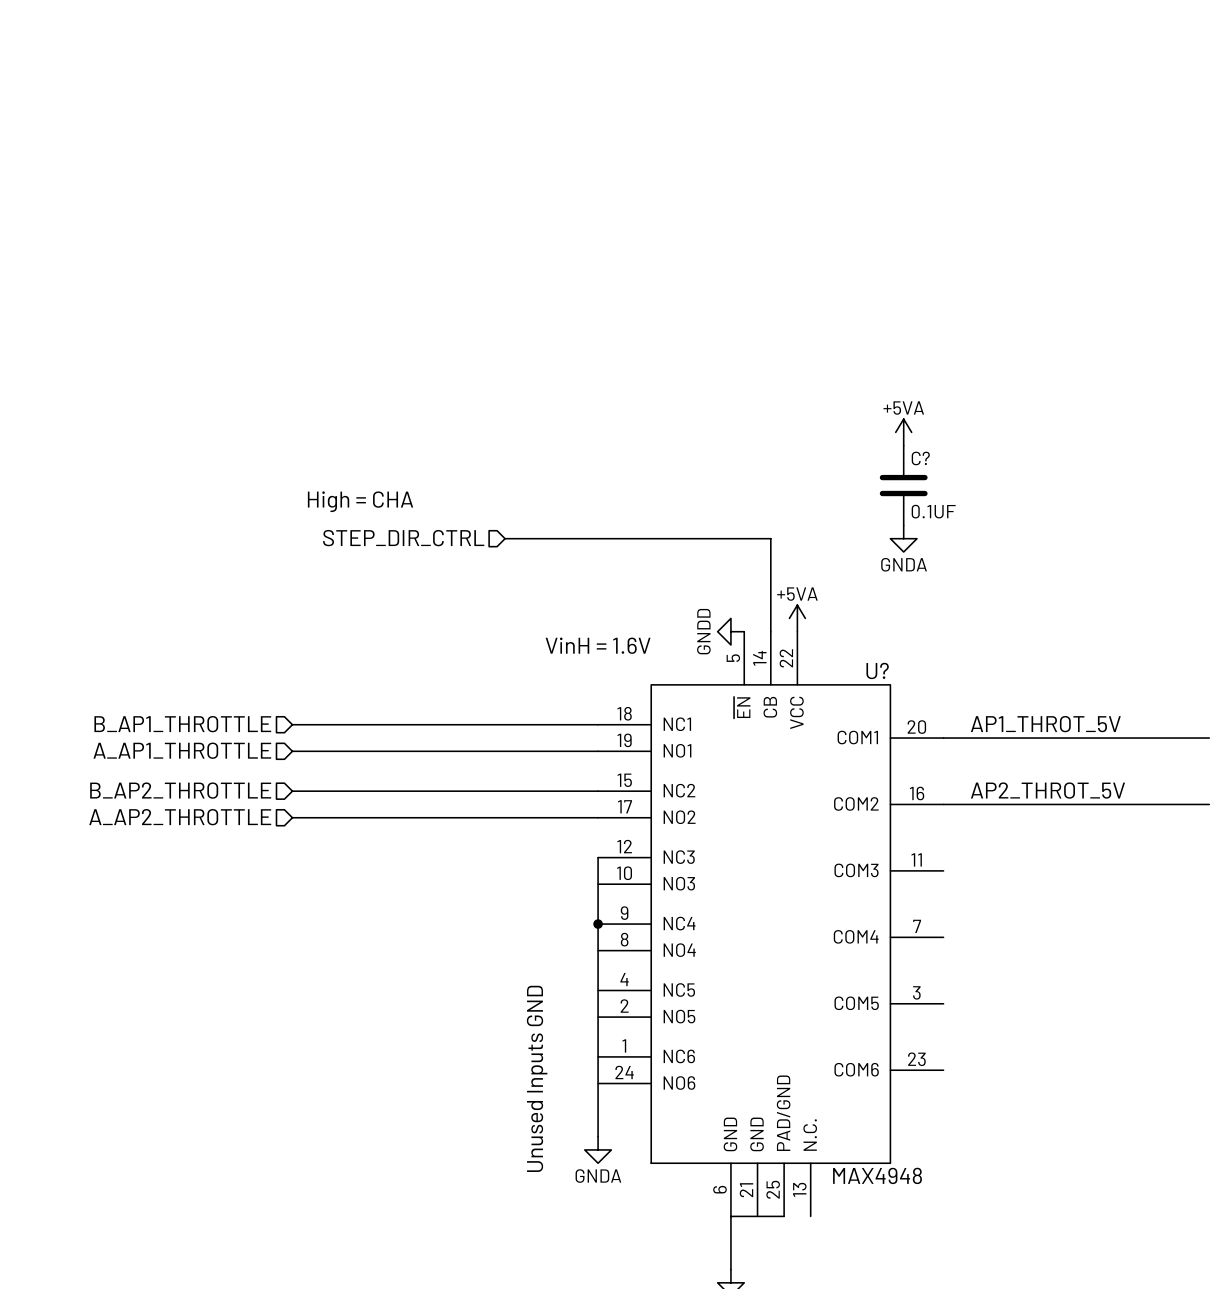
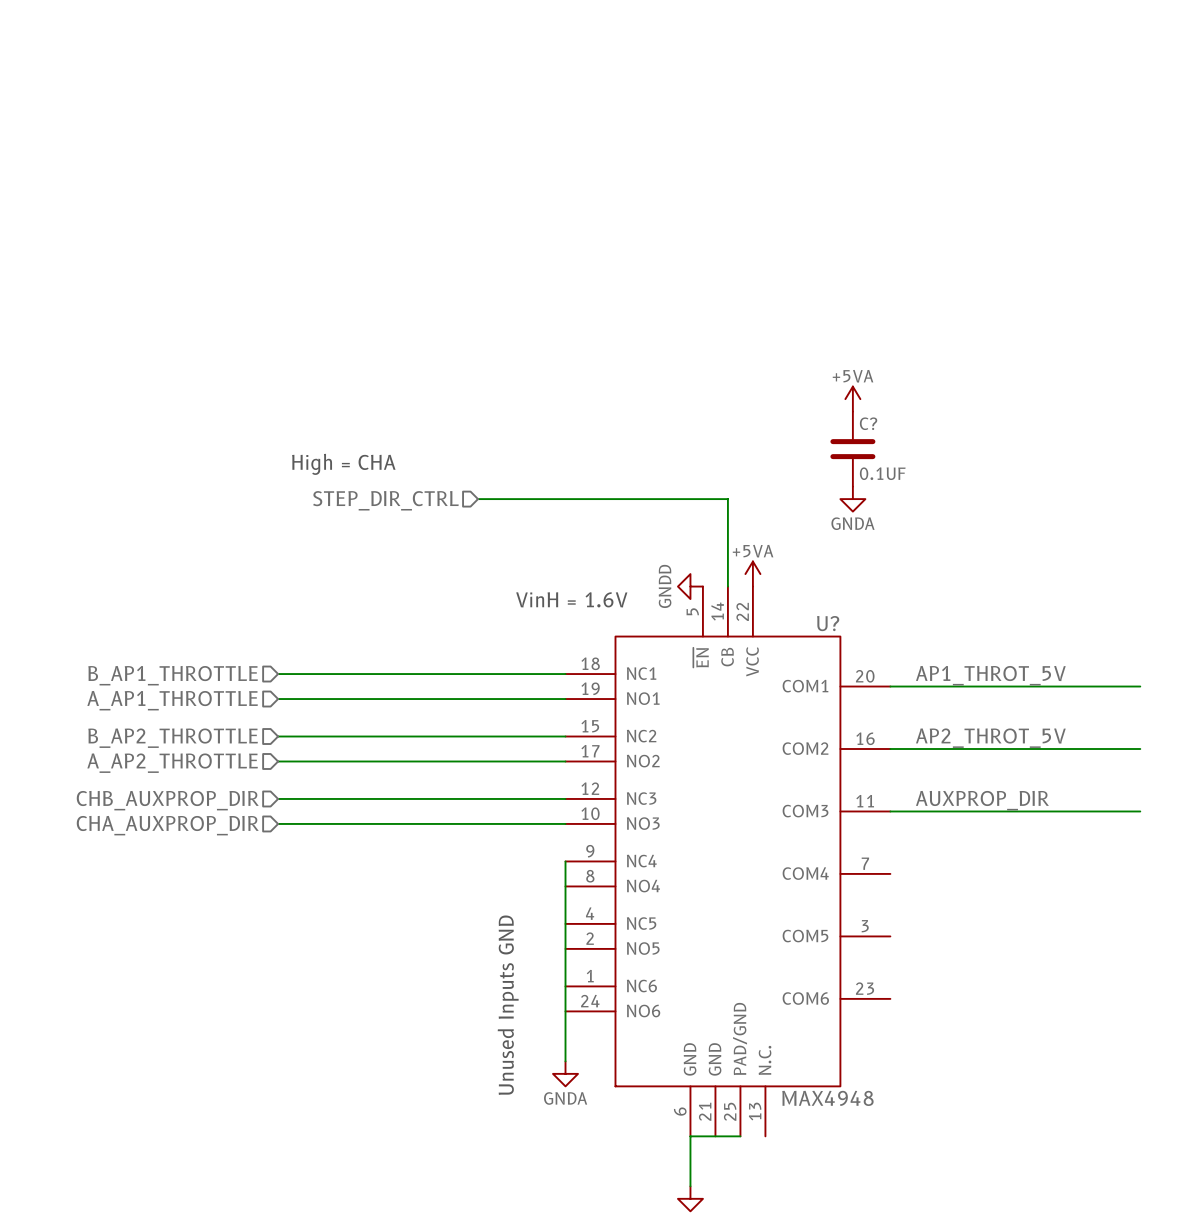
label: none -> AUXPROP_DIR (982, 800)
hierarchical label: none -> CHB_AUXPROP_DIR (167, 800)
wire: (598, 857) (598, 924) -> (565, 798) (278, 798)
wire: none -> (890, 811) (1140, 811)
hierarchical label: none -> CHA_AUXPROP_DIR (167, 825)
wire: none -> (278, 823) (565, 823)
junction: (598, 924) -> none

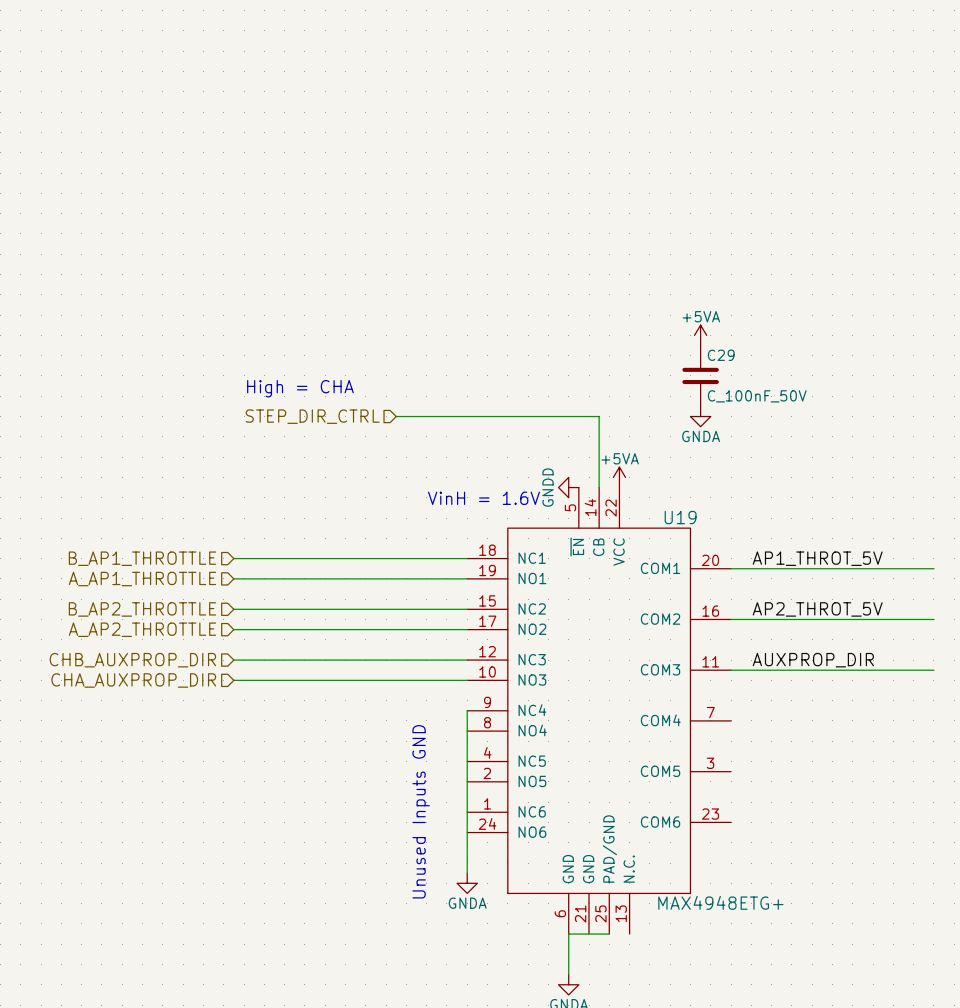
C? name: C? (868, 423) -> C29 (721, 355)
C? value: 0.1UF (882, 473) -> C_100nF_50V (757, 396)
U? name: U? (828, 623) -> U19 (680, 517)
U? value: MAX4948 (827, 1098) -> MAX4948ETG+ (720, 902)

